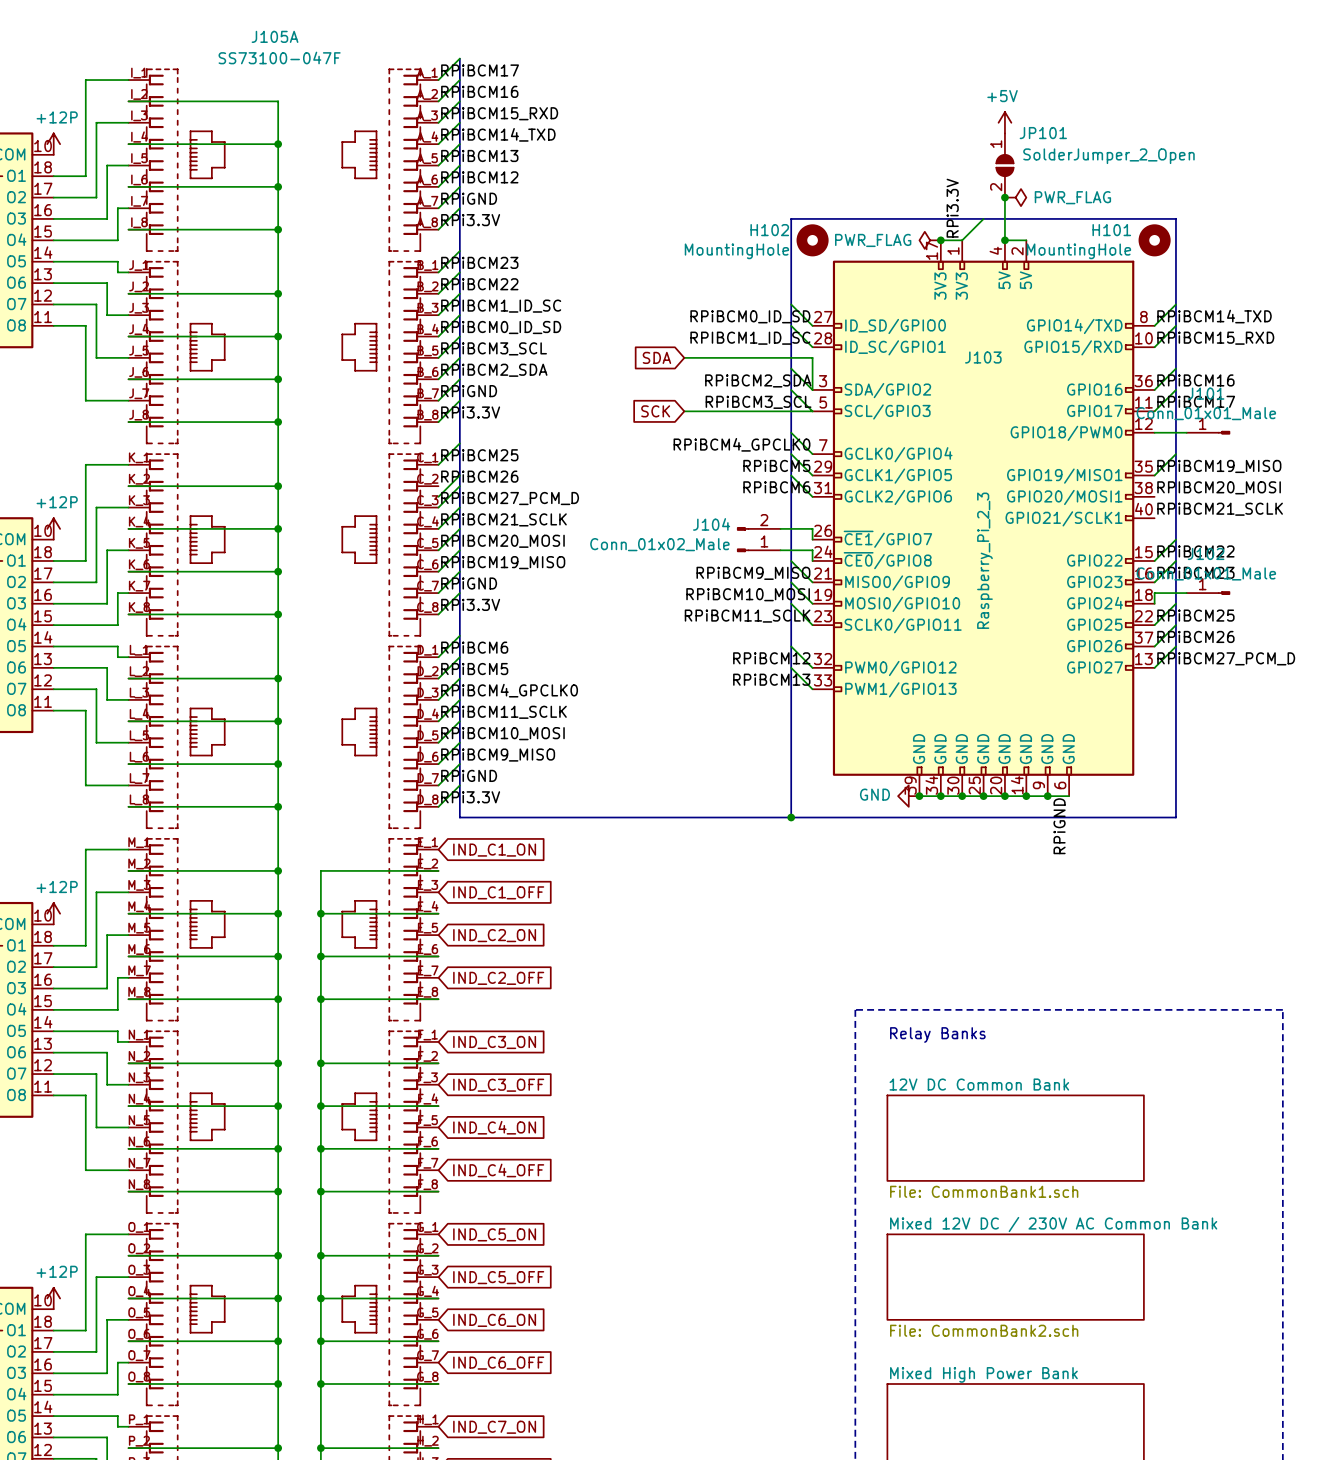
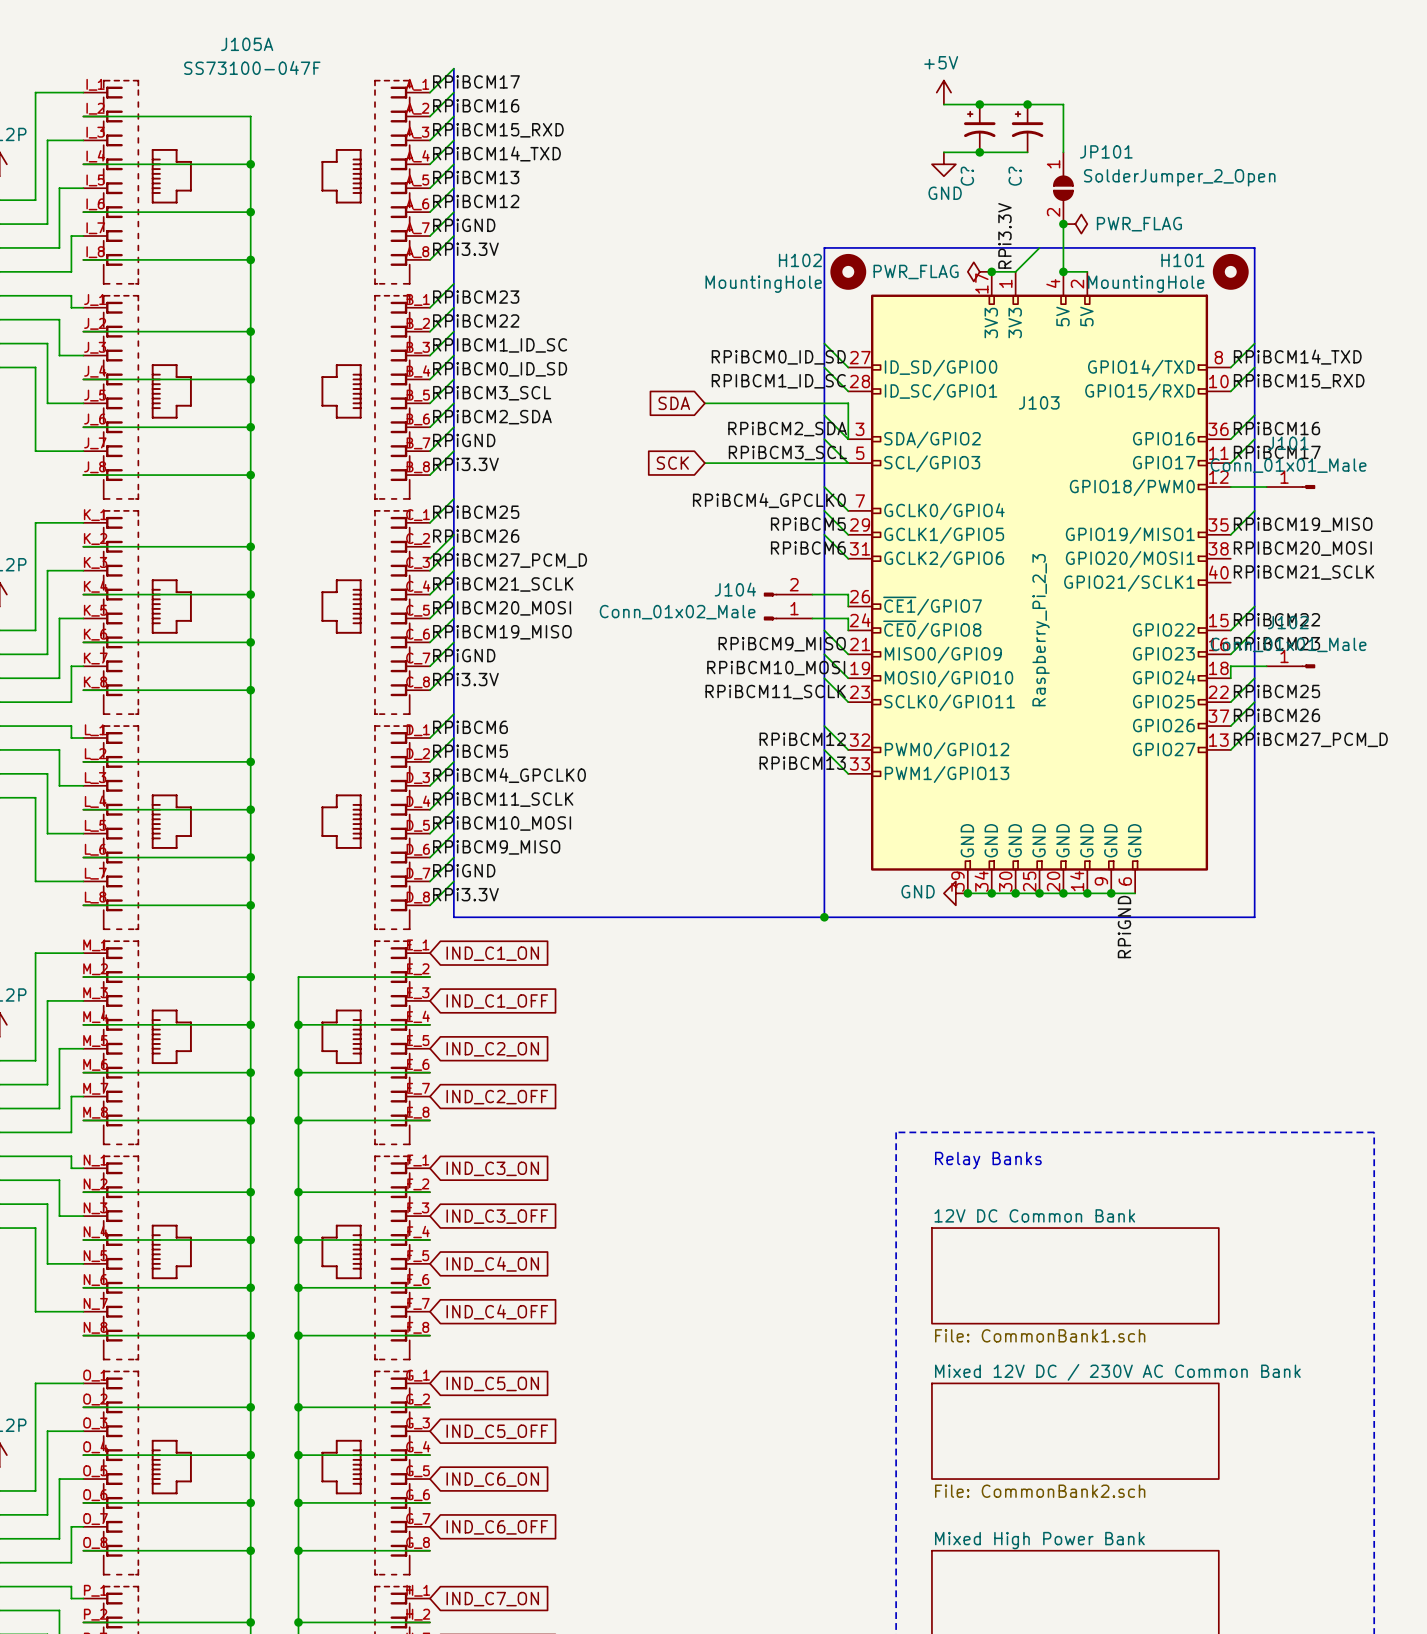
wire: none -> (943, 104) (1063, 104) (1063, 152)
junction: none -> (979, 104)
junction: none -> (1027, 104)
C?: none -> (979, 128)
C?: none -> (1027, 128)
power symbol position: +5V (1004, 122) -> +5V (943, 92)
wire: none -> (943, 152) (1027, 152)
junction: none -> (979, 152)
power symbol: none -> GND (943, 164)

